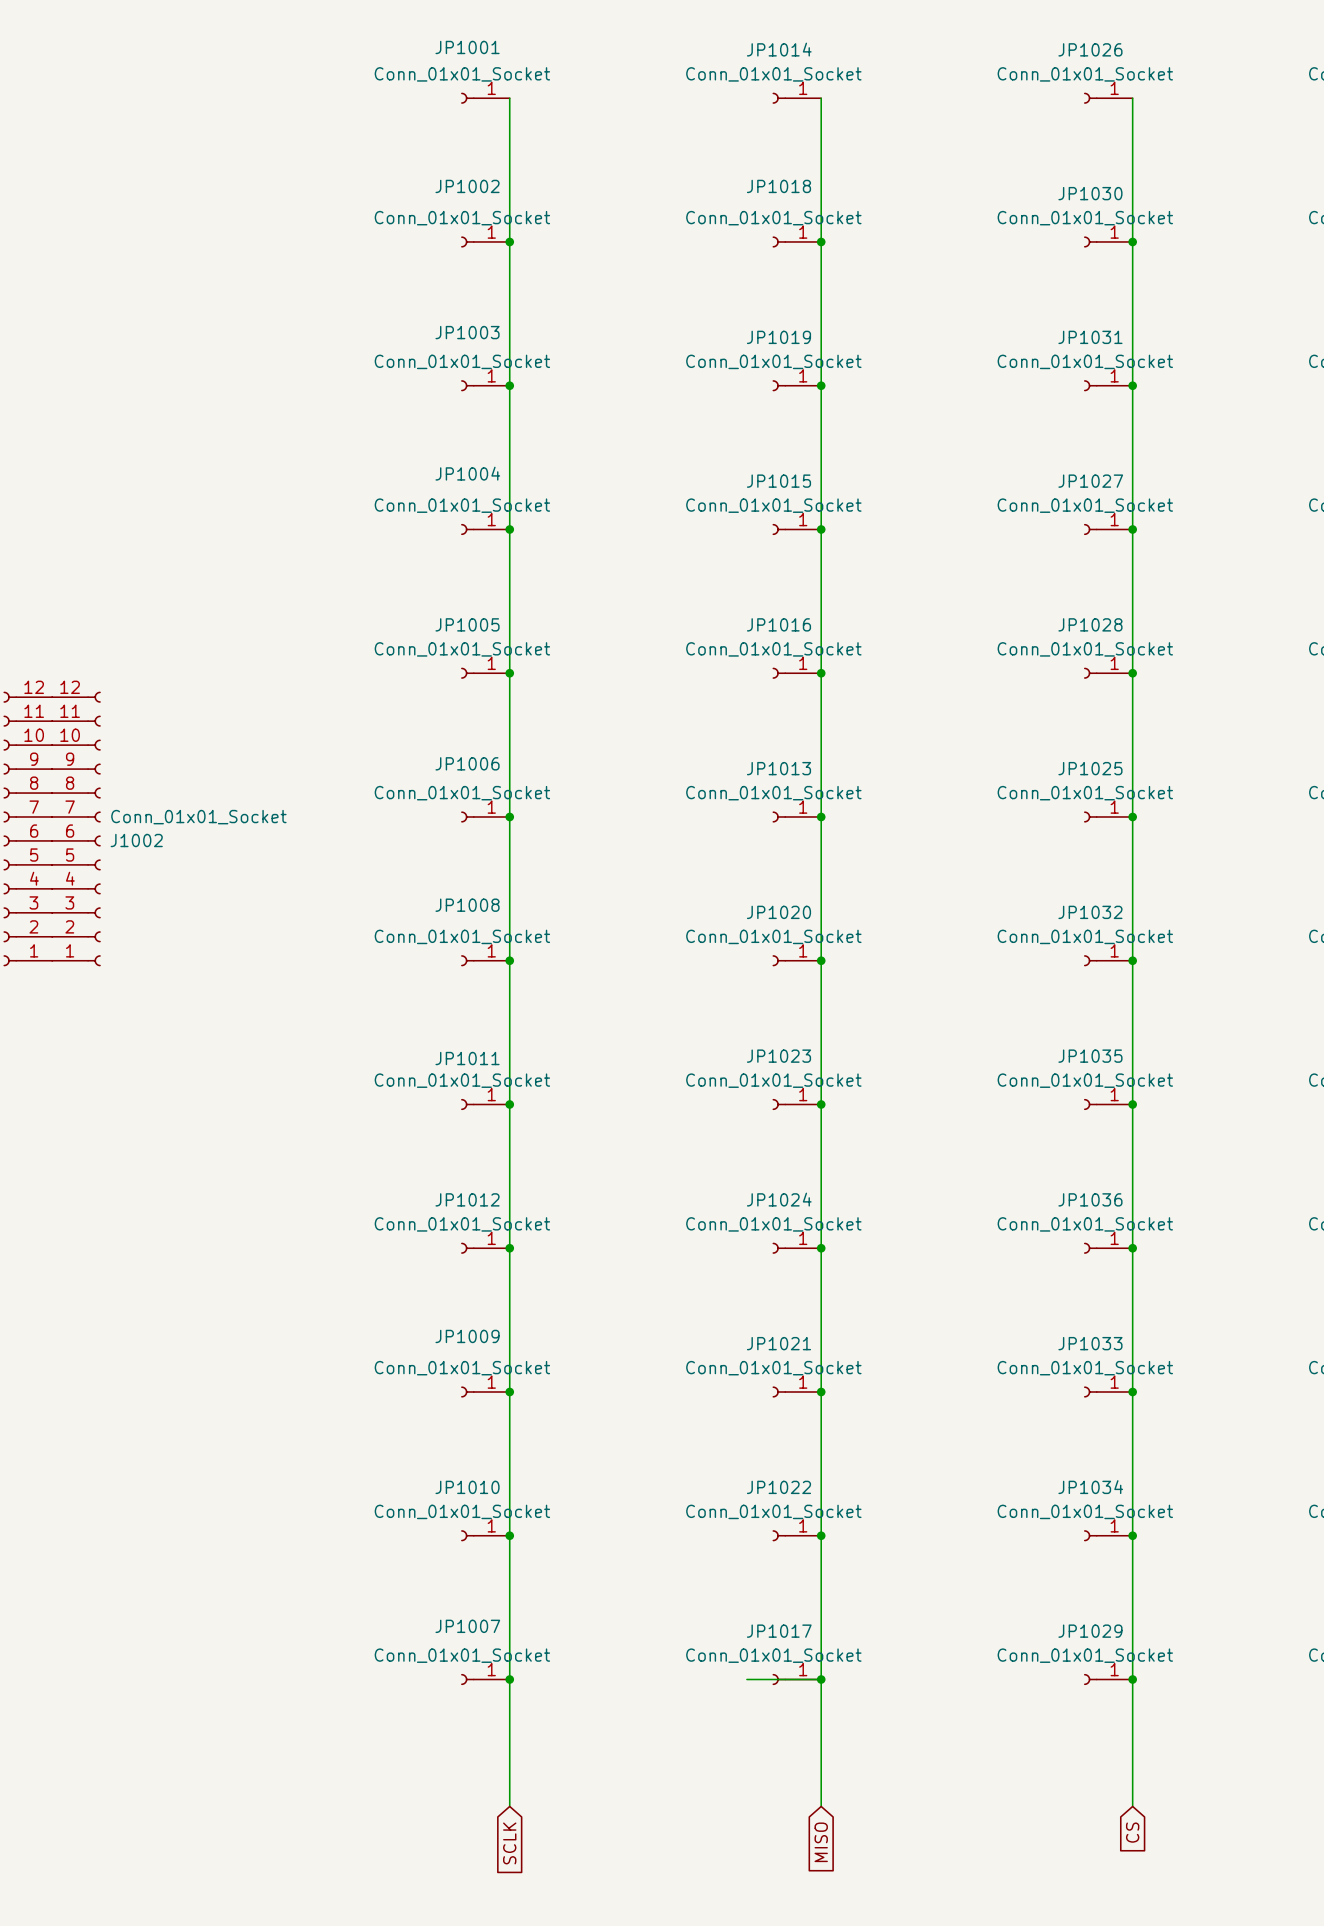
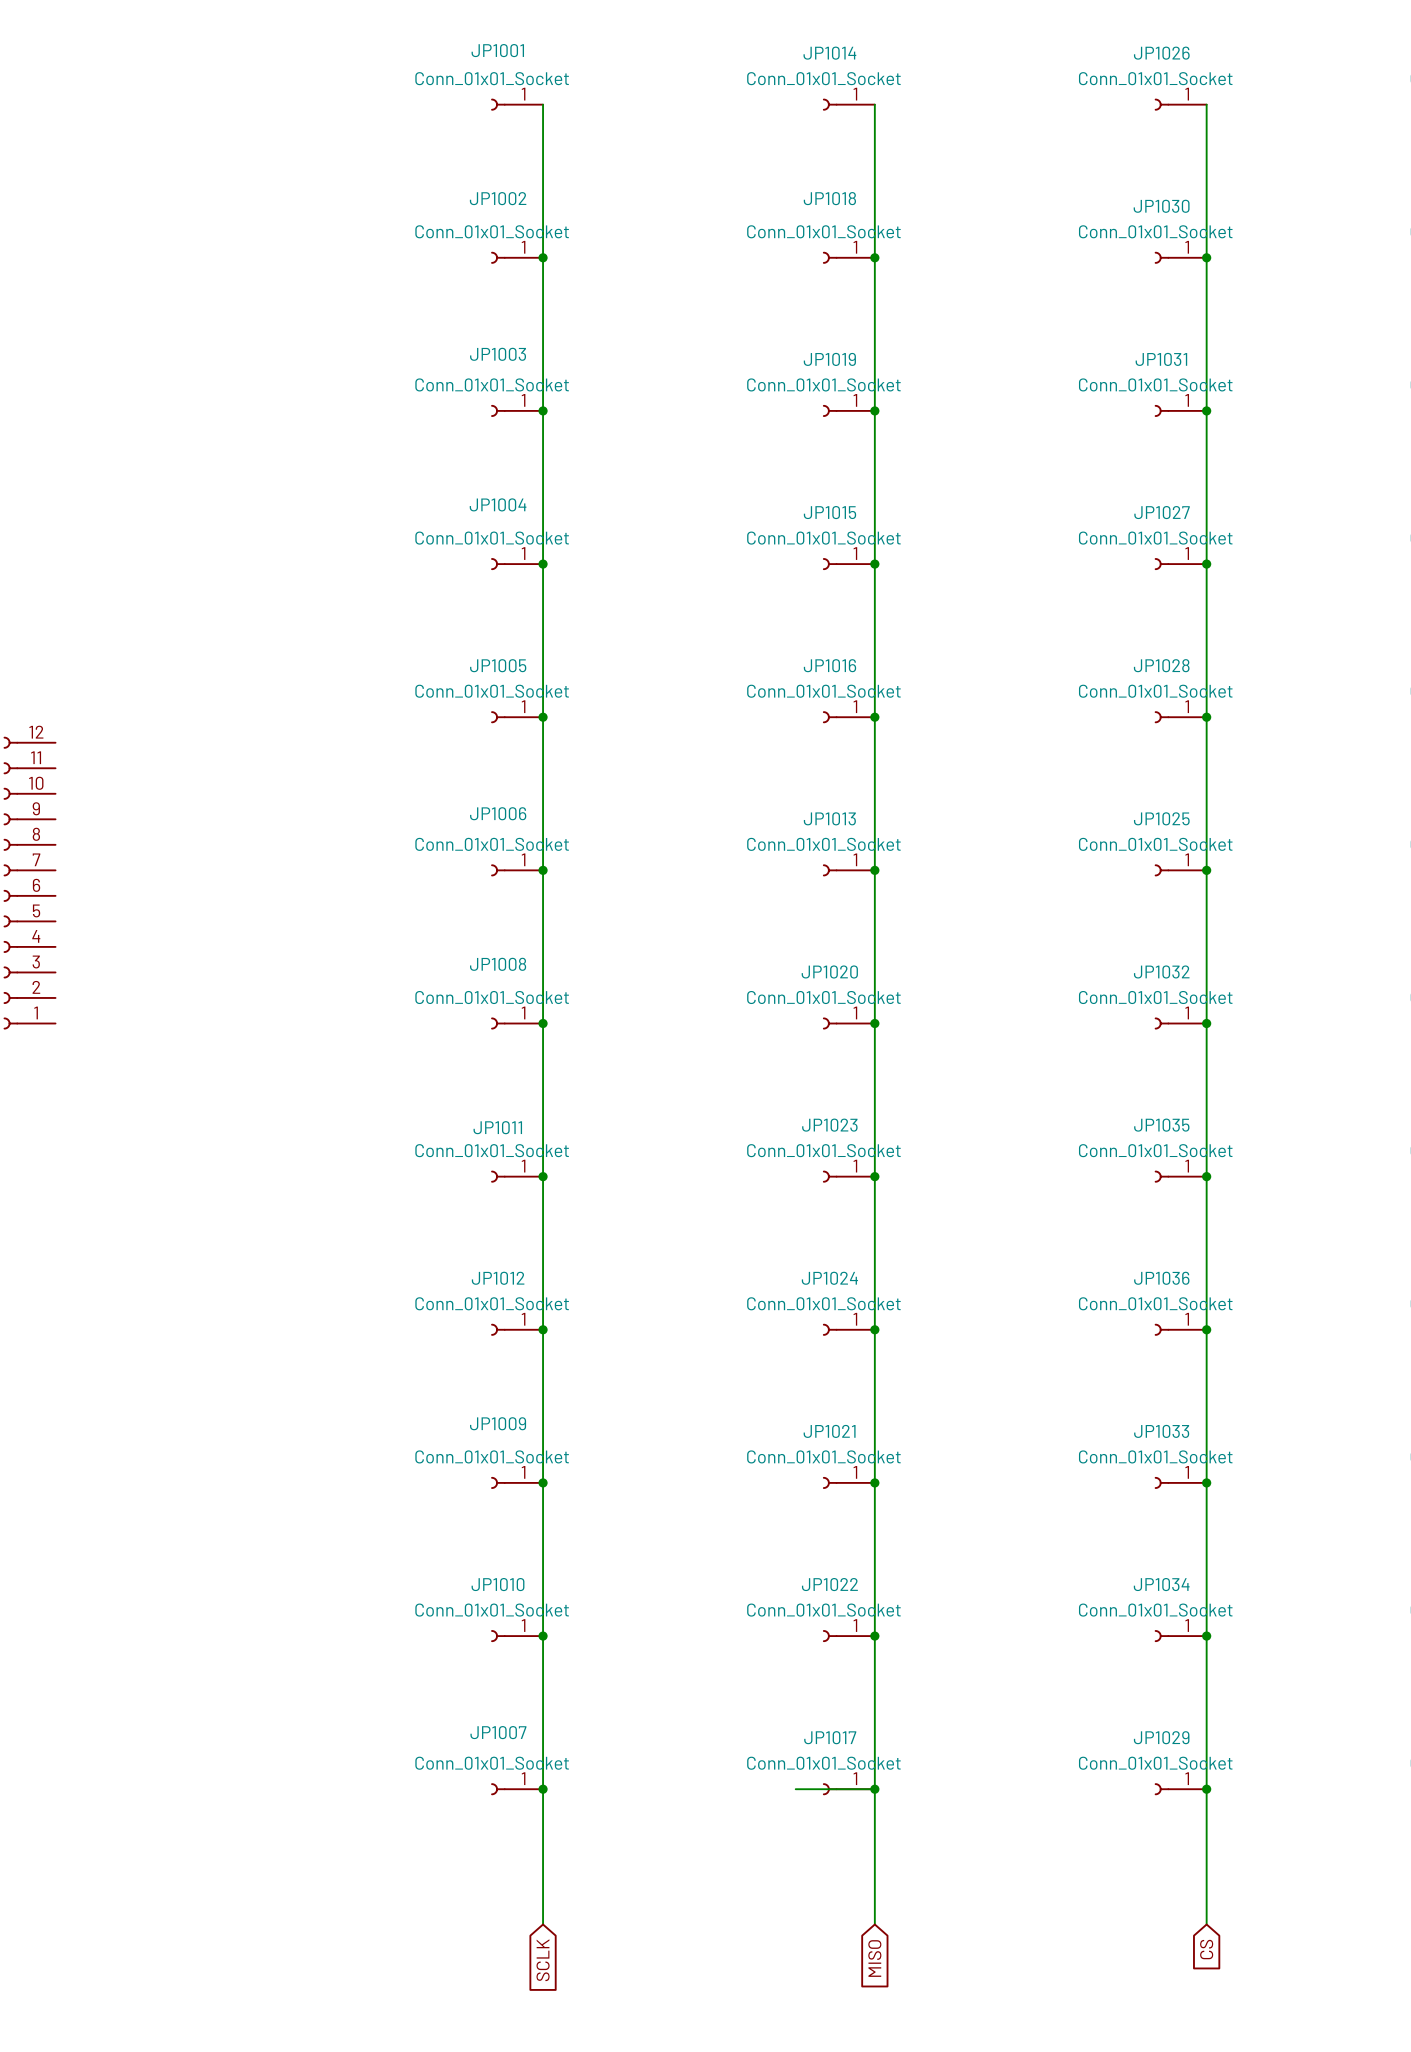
J1002: Conn_01x01_Socket (76, 828) -> none

